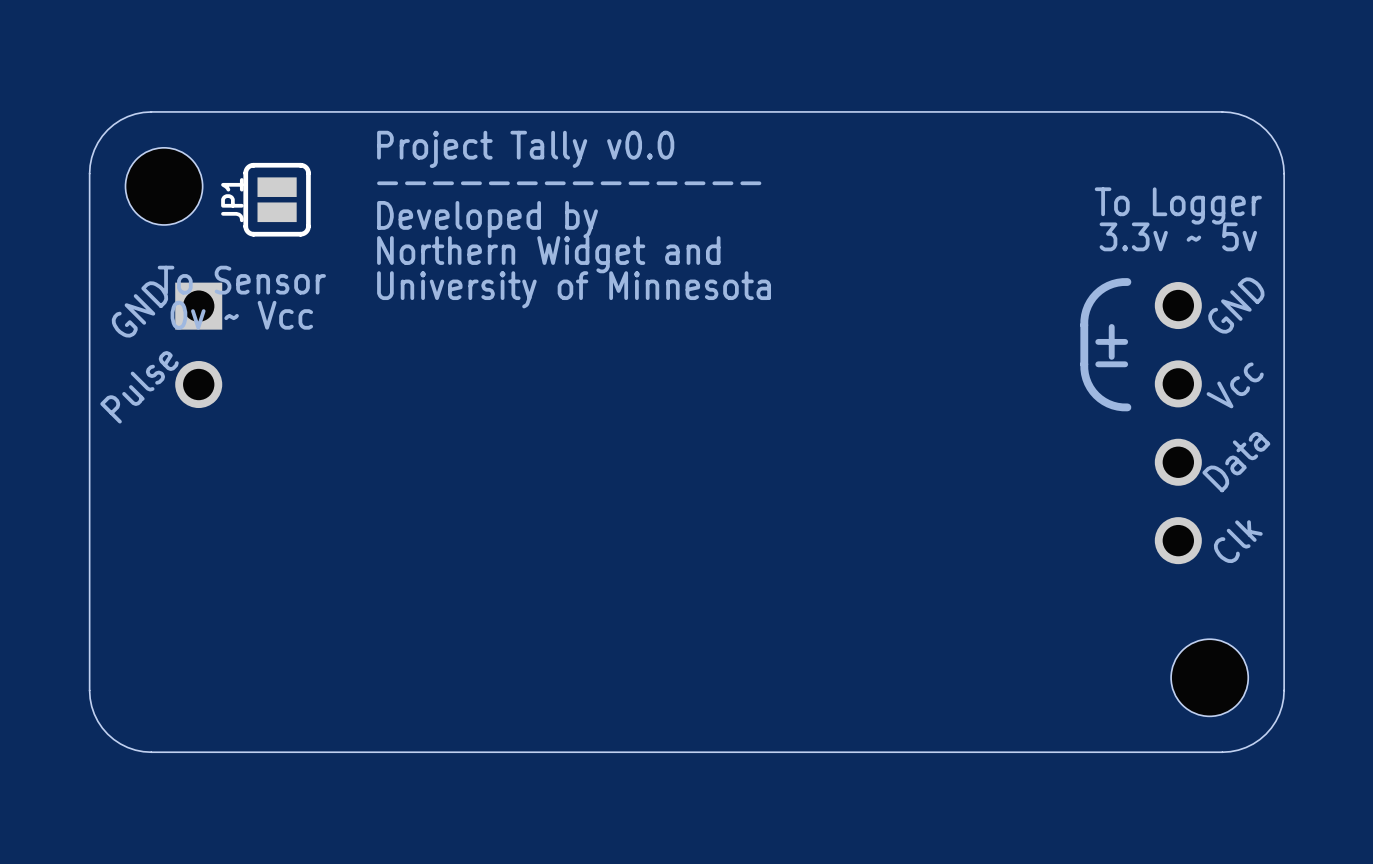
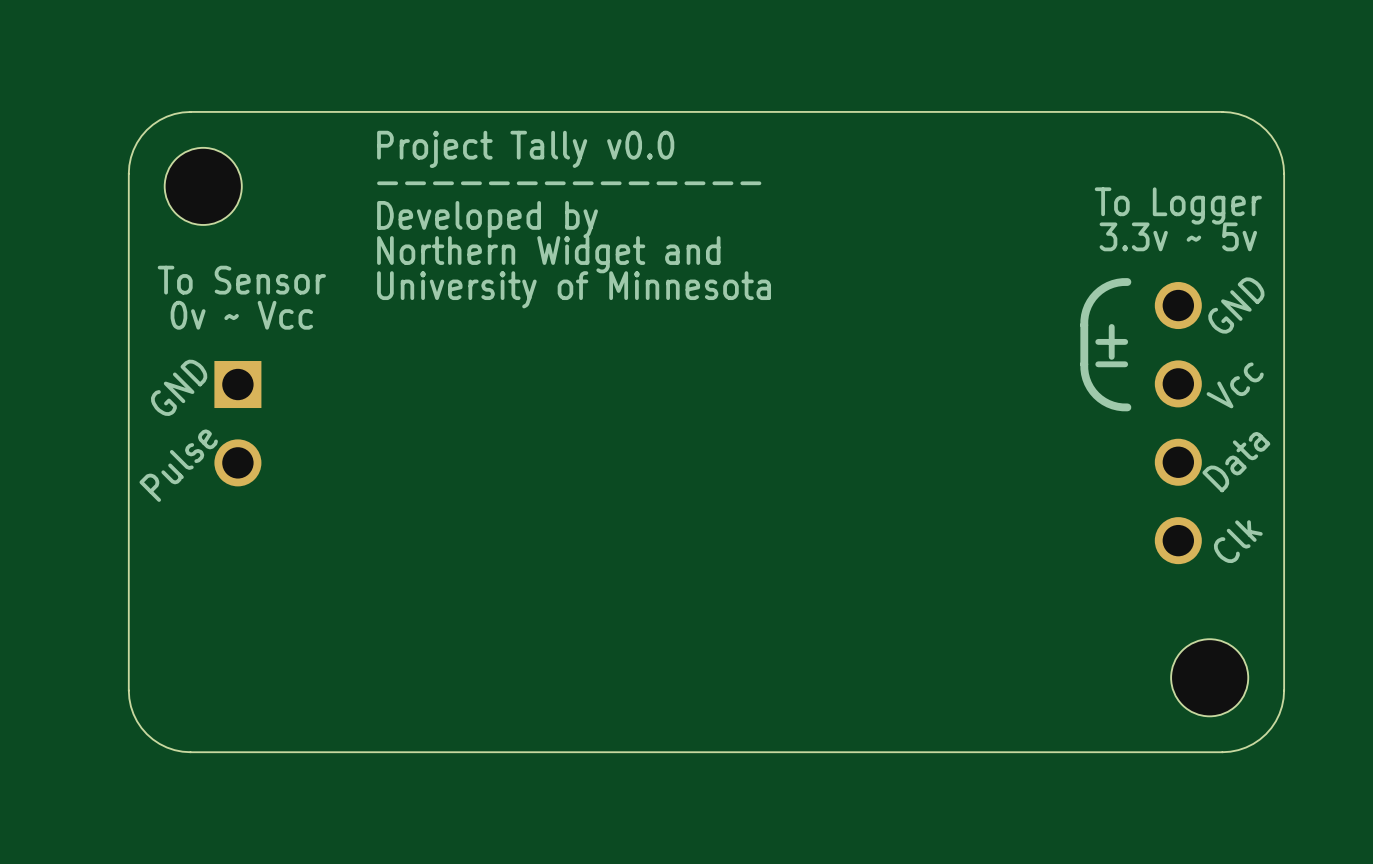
board edge: (190, 111) (143, 112) (120, 120) (107, 130) (97, 142) (91, 157) (89, 173) (90, 698) (97, 721) (107, 734) (120, 743) (143, 751) (190, 752) -> (190, 111) (166, 116) (146, 130) (133, 150) (128, 173) (129, 698) (137, 721) (152, 739) (166, 747) (190, 752)
part position: (164, 186) -> (203, 186)
JP1: (277, 199) -> none
text position: GND (139, 309) -> GND (179, 387)
part position: (198, 345) -> (237, 423)
text position: Pulse (139, 387) -> Pulse (178, 465)

